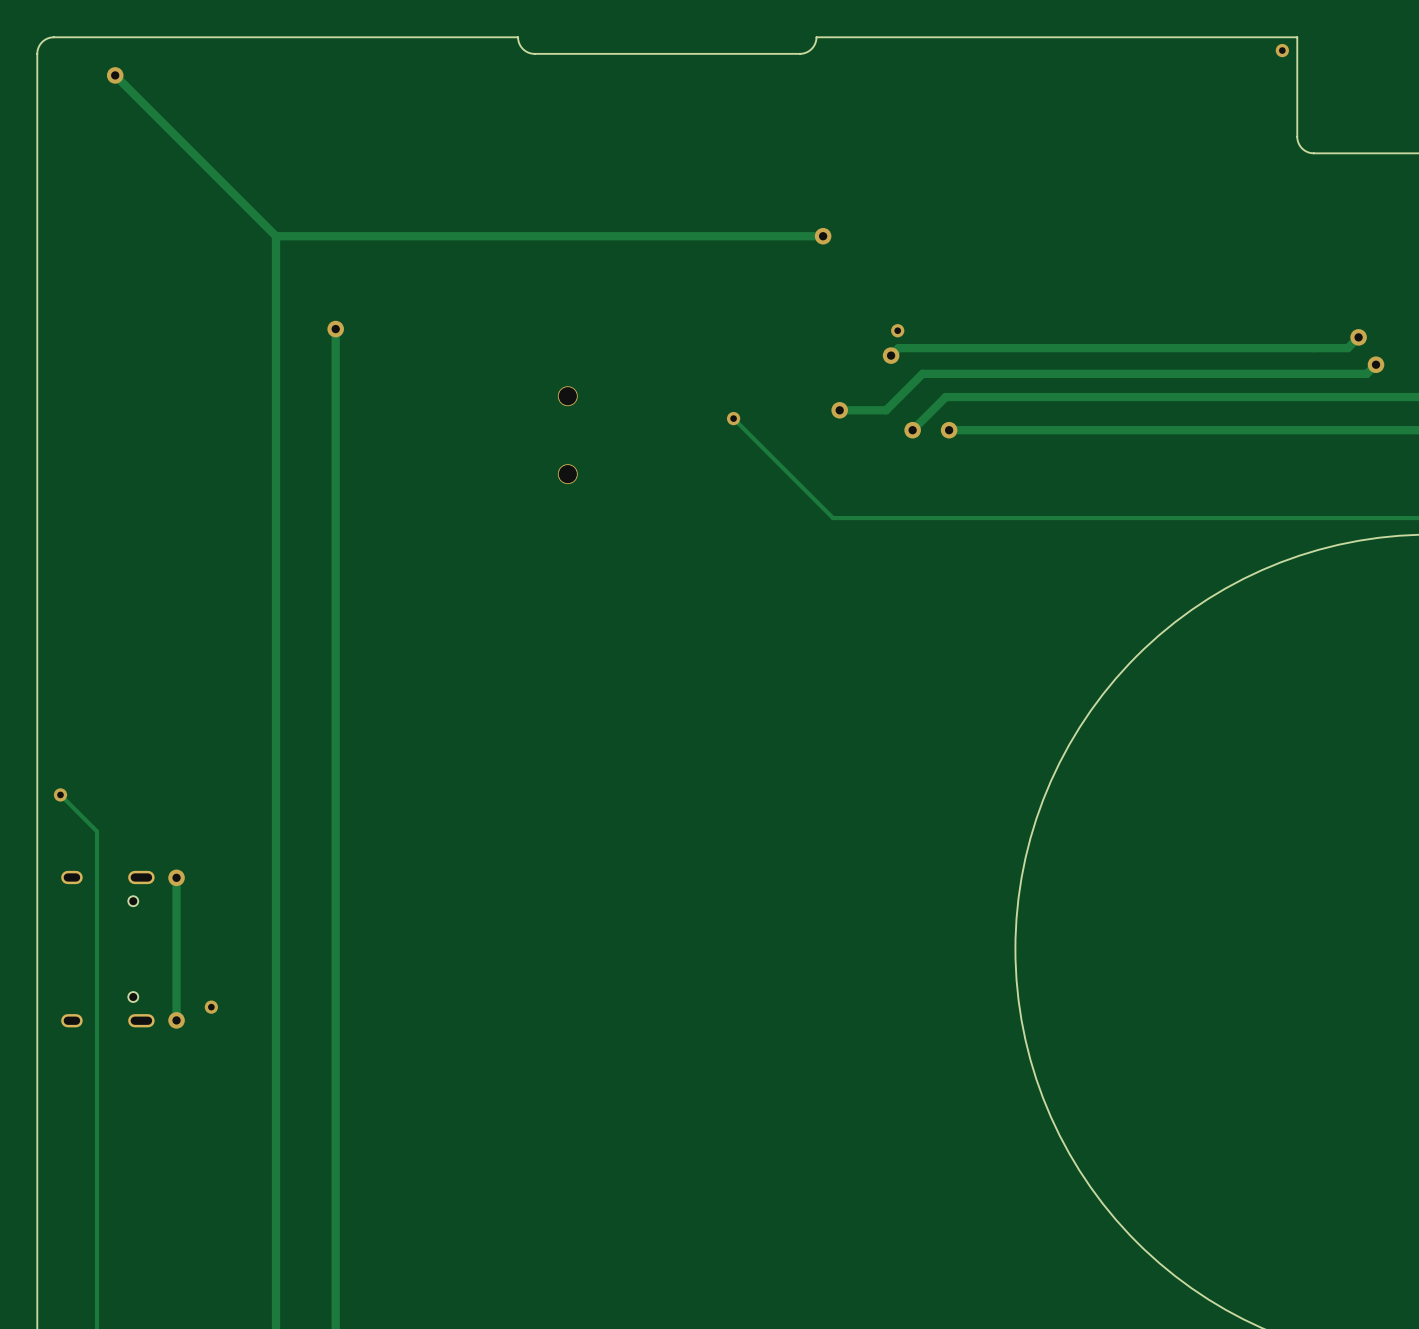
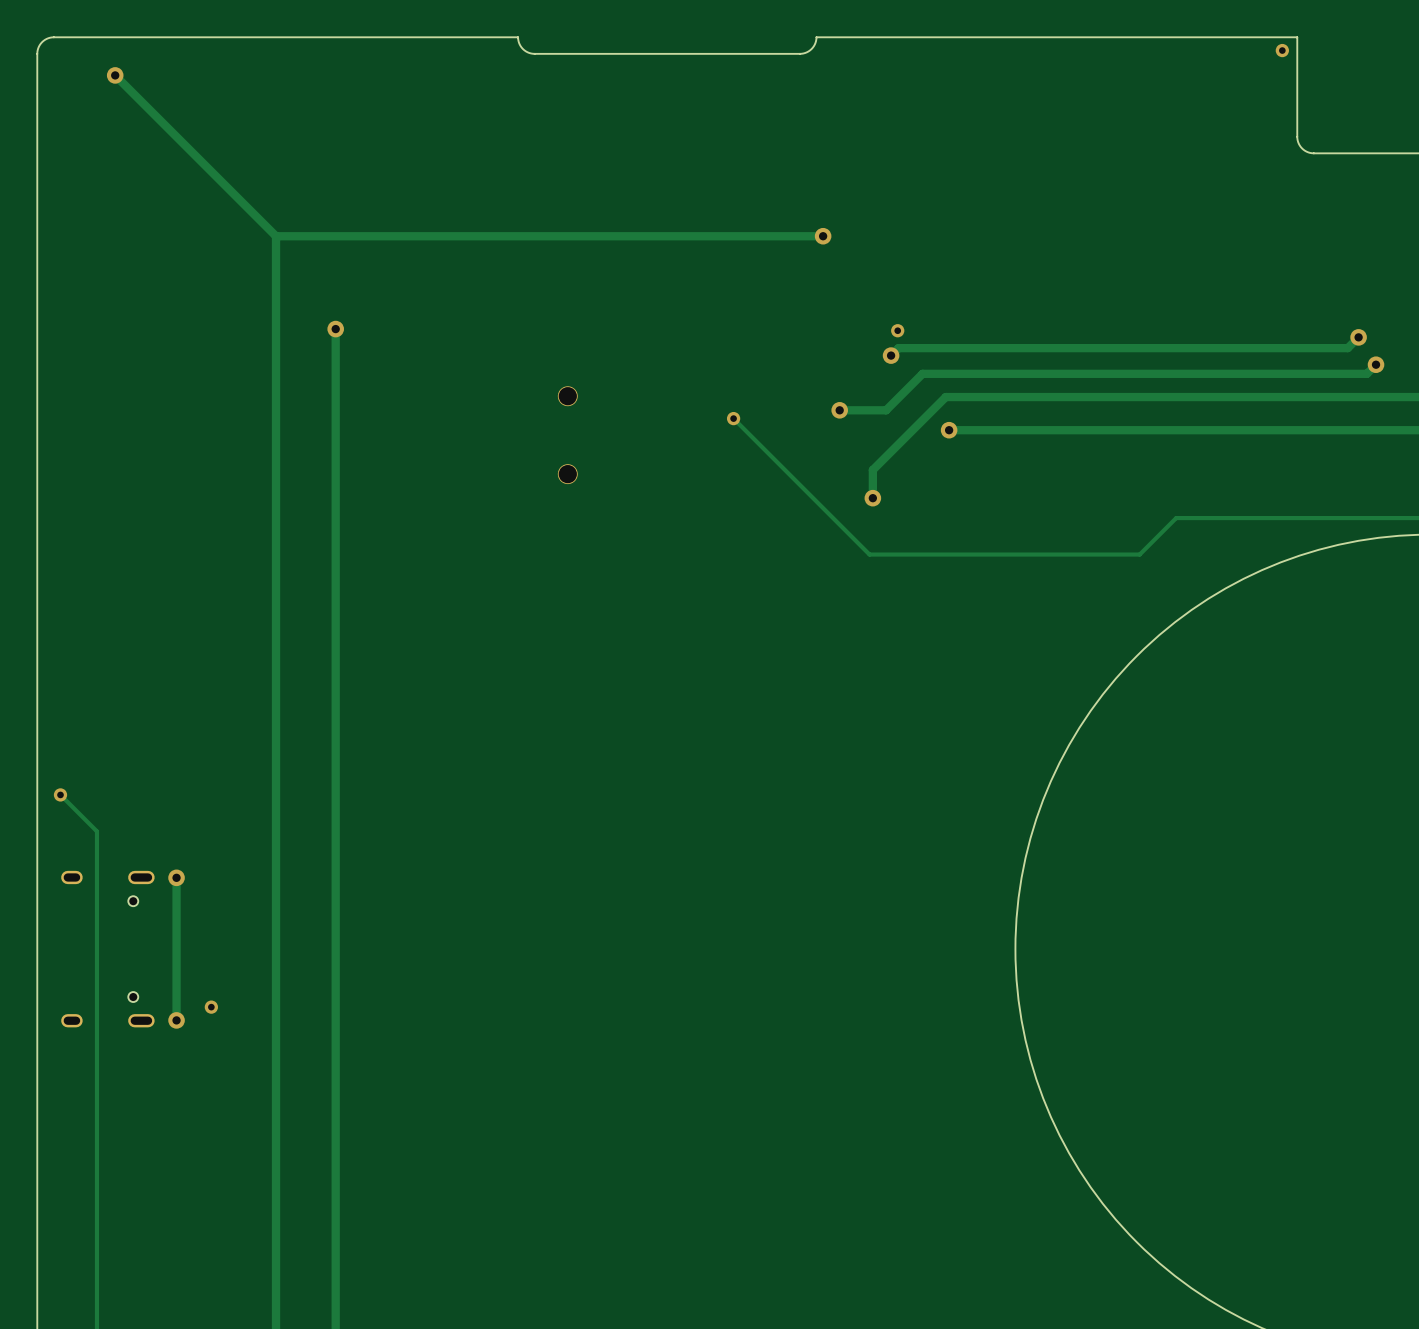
track: none -> (912, 430) (872, 469) (872, 498)
via position: (912, 430) -> (872, 498)
track: (1176, 518) (833, 518) -> (1176, 518) (1139, 554) (869, 554) (833, 518)

